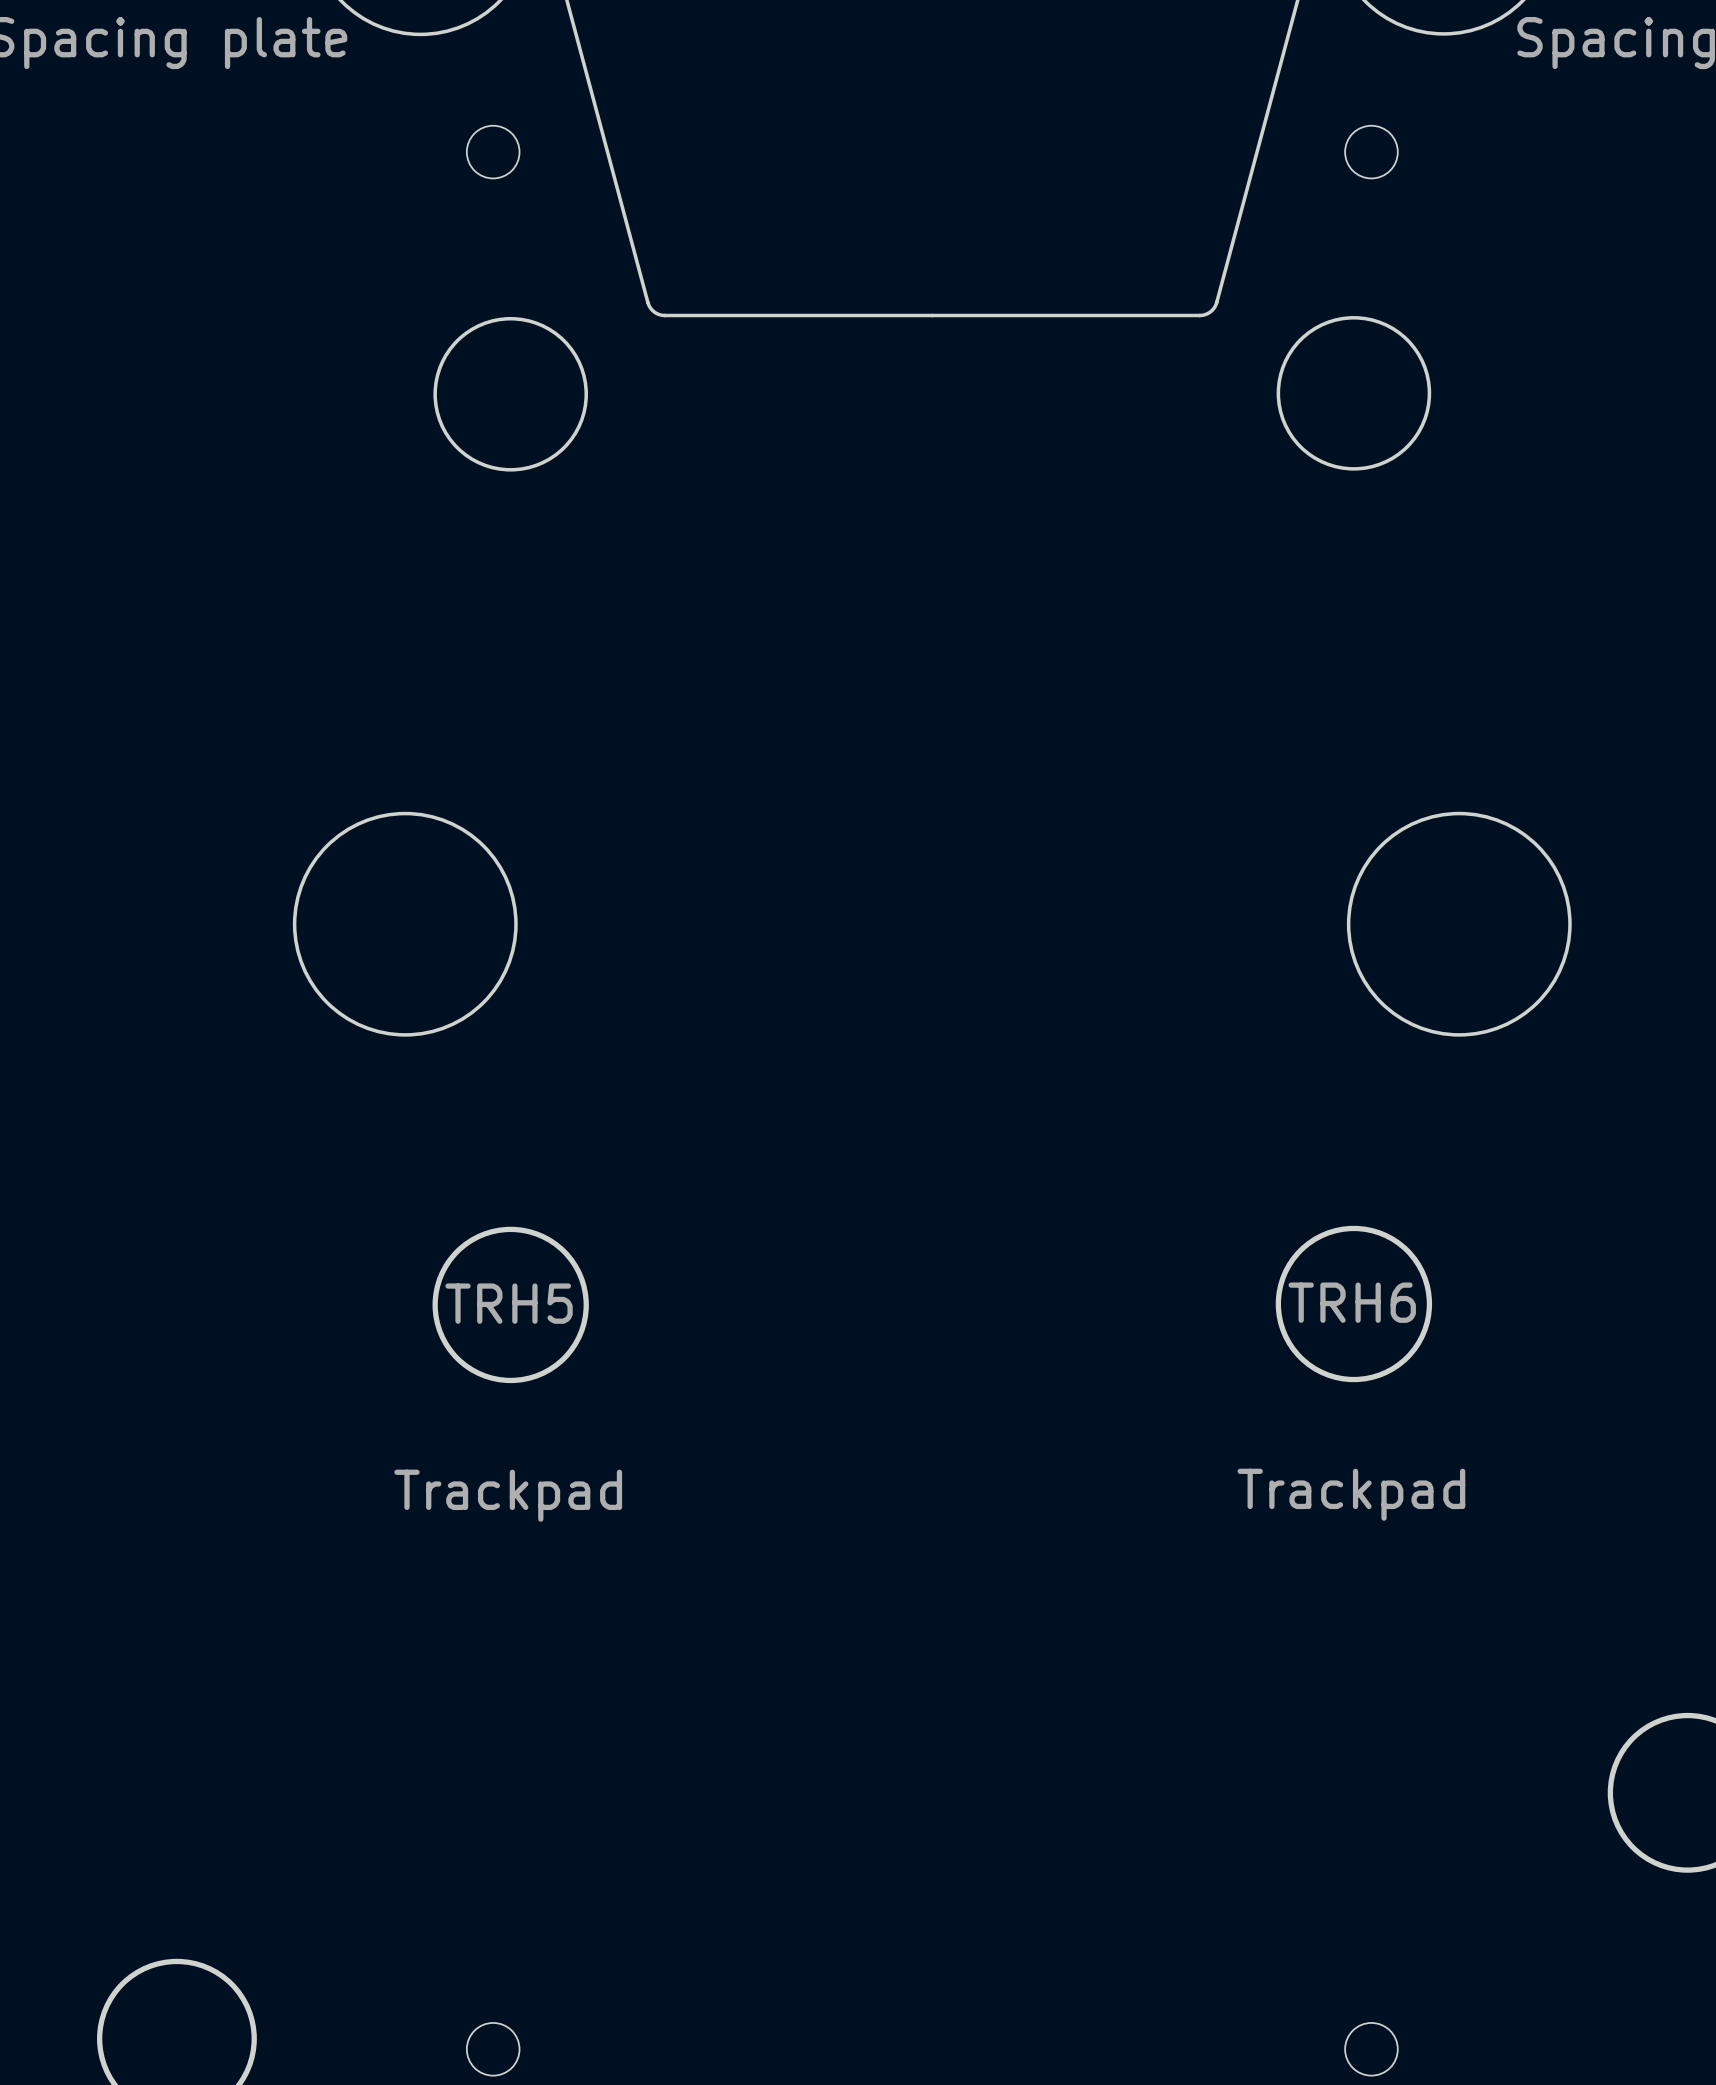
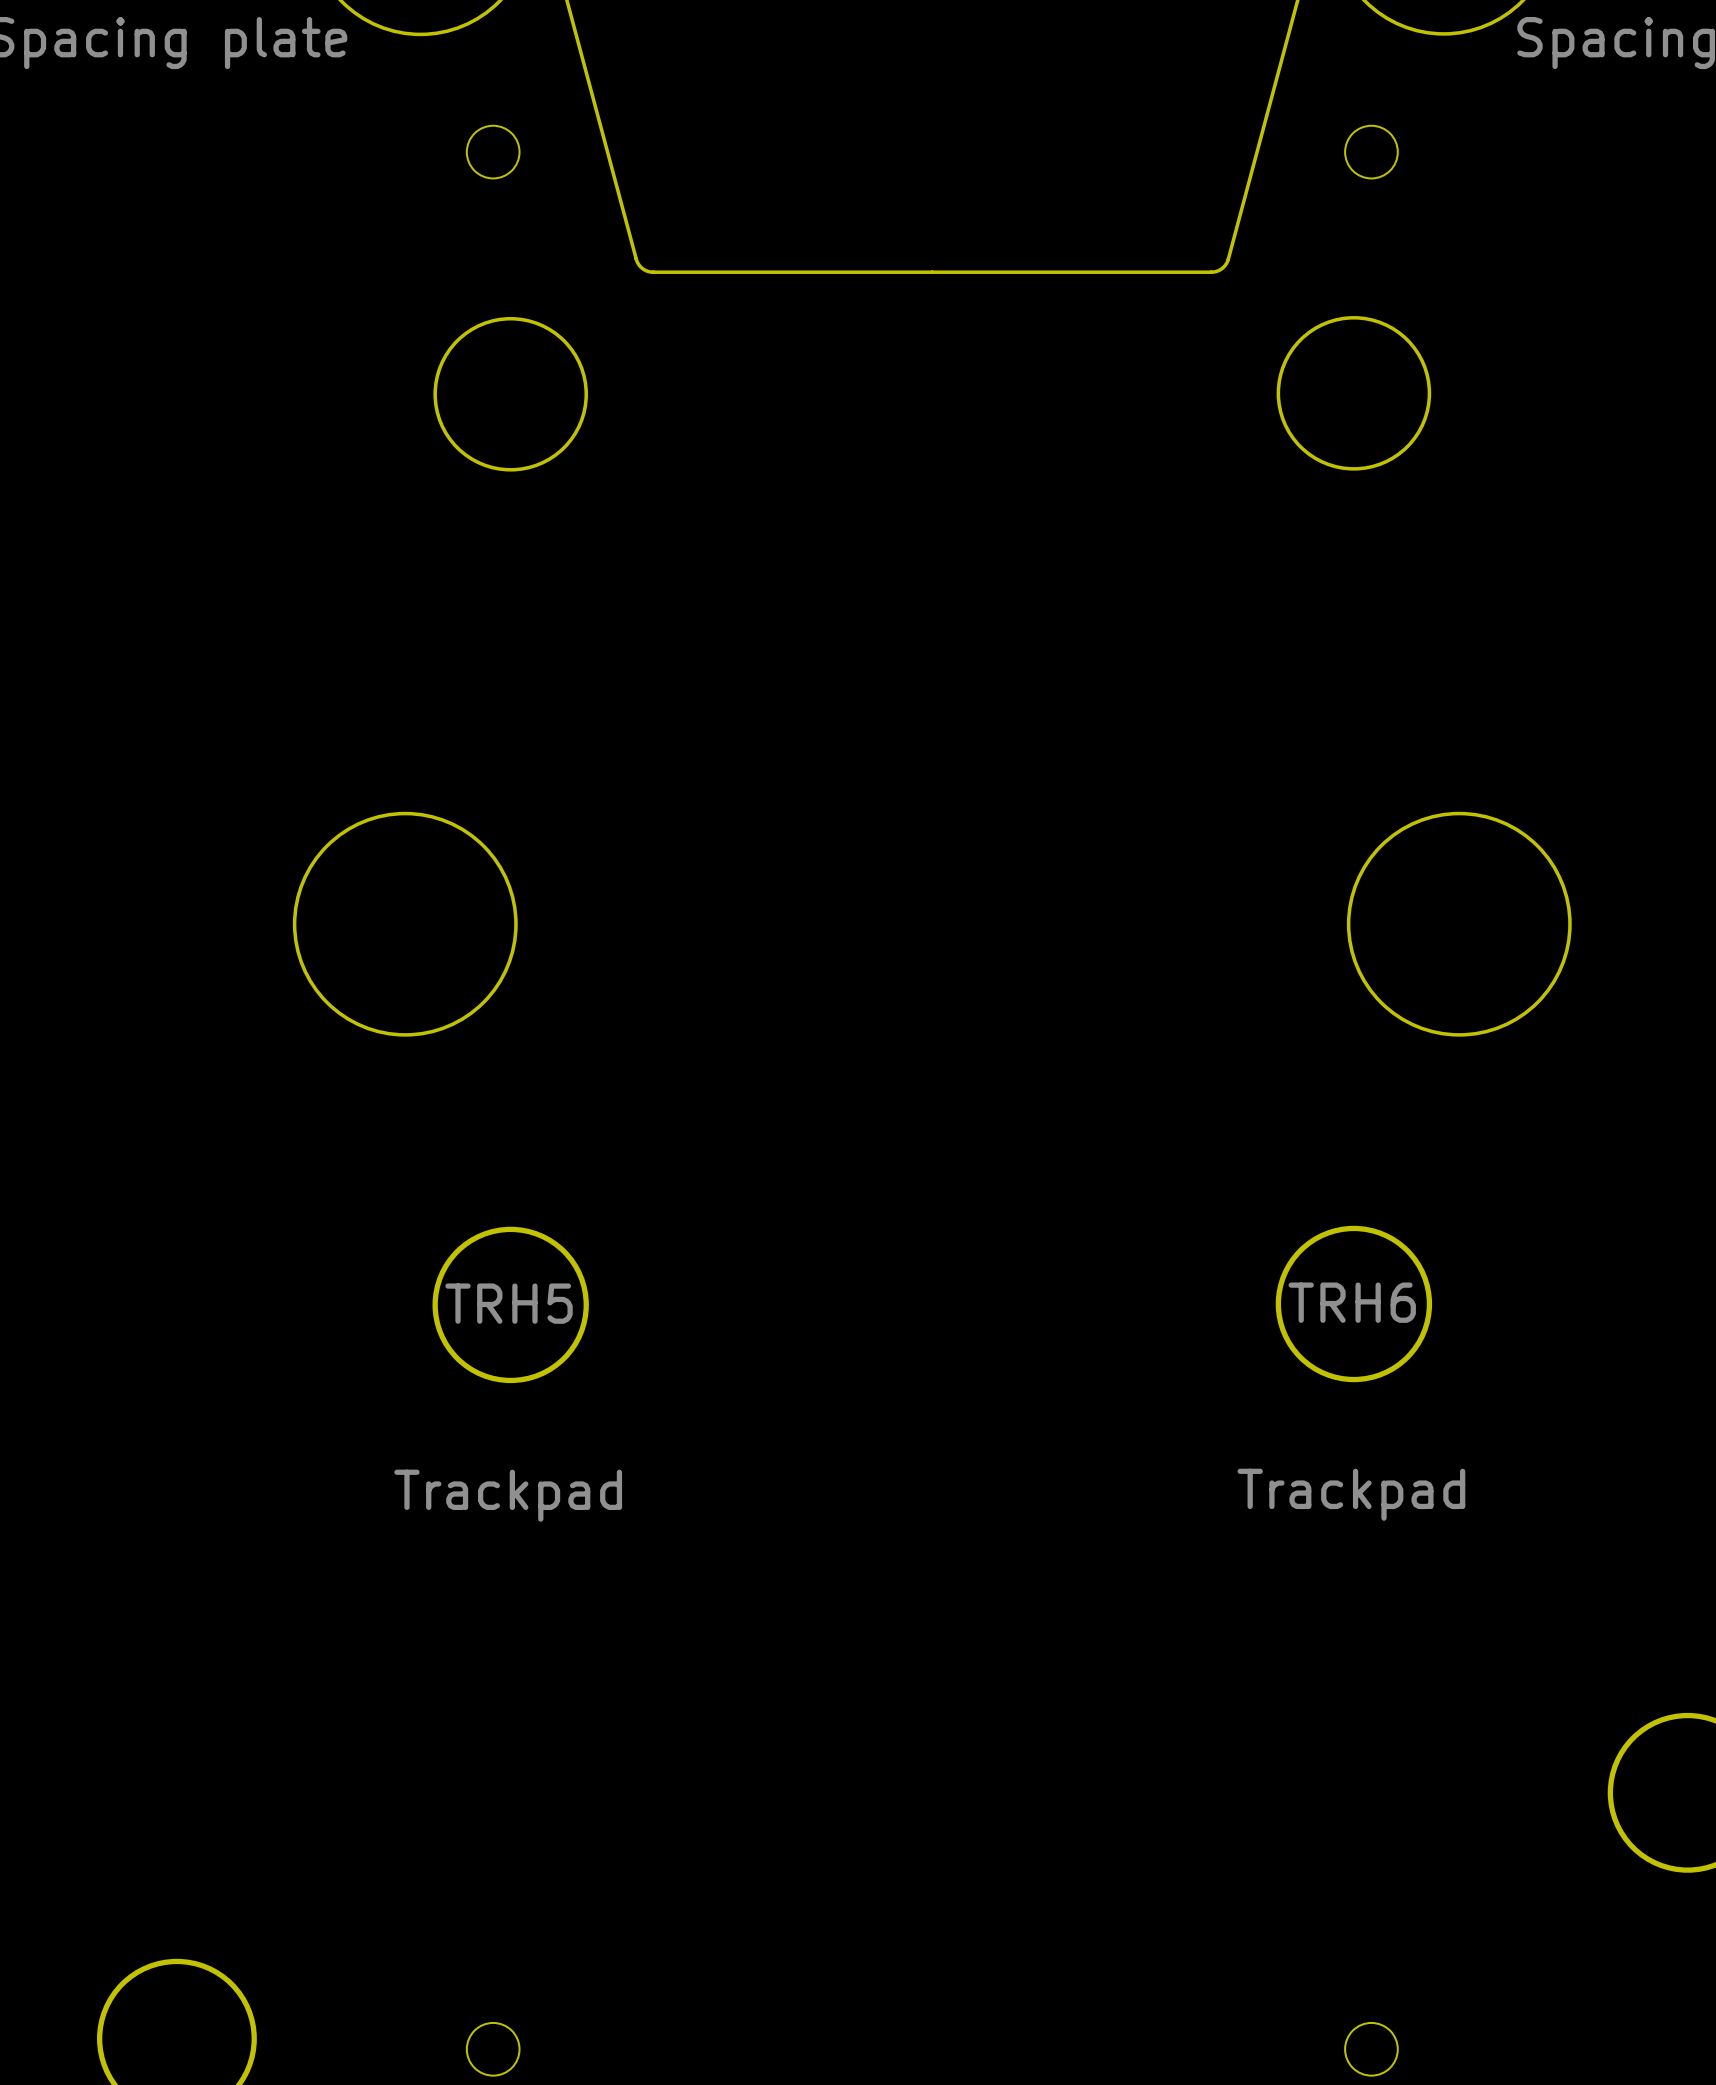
board edge: (636, 259) (649, 306) (656, 313) (664, 315) (1201, 315) (1208, 312) (1215, 306) (1228, 259) -> (636, 259) (642, 268) (653, 272) (1211, 272) (1222, 268) (1228, 259)

